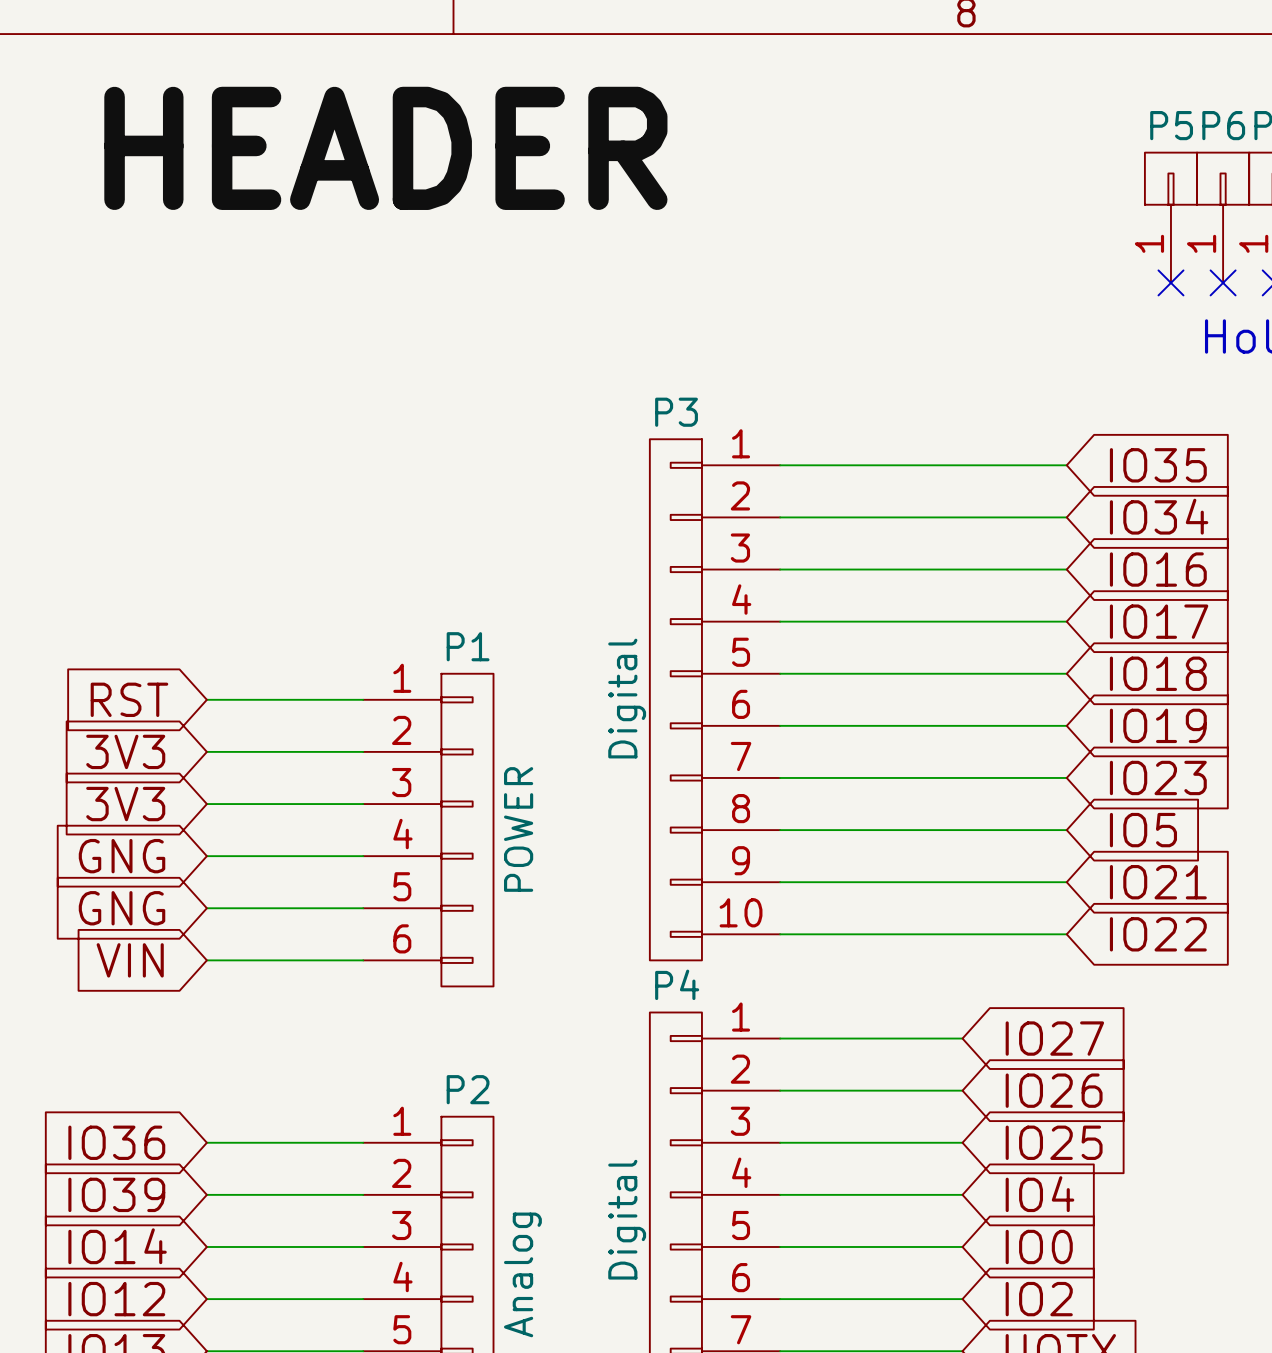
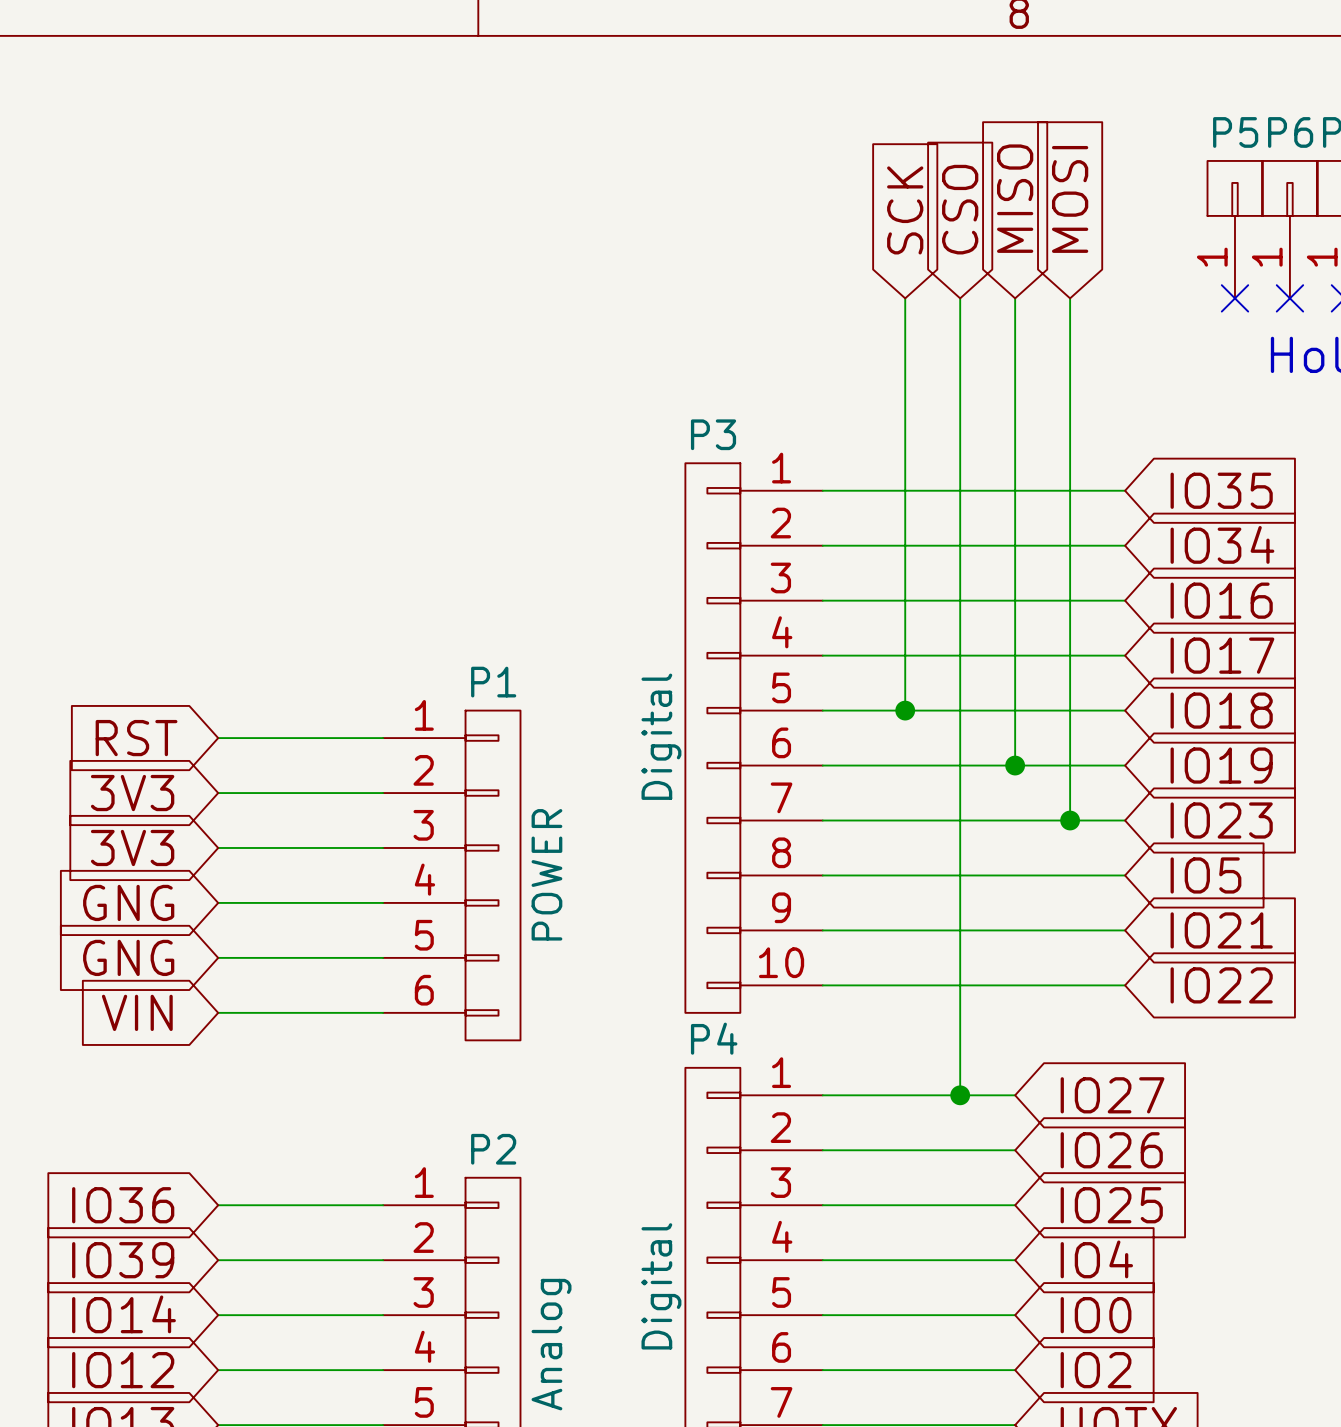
label: HEADER (385, 148) -> none
global label: none -> MISO (1015, 198)
global label: none -> MOSI (1070, 199)
global label: none -> CSO (960, 209)
global label: none -> SCK (905, 210)
wire: none -> (905, 298) (905, 710)
wire: none -> (960, 298) (960, 1095)
wire: none -> (1015, 298) (1015, 765)
wire: none -> (1070, 298) (1070, 820)
junction: none -> (905, 710)
junction: none -> (1015, 765)
junction: none -> (1070, 820)
junction: none -> (960, 1095)

